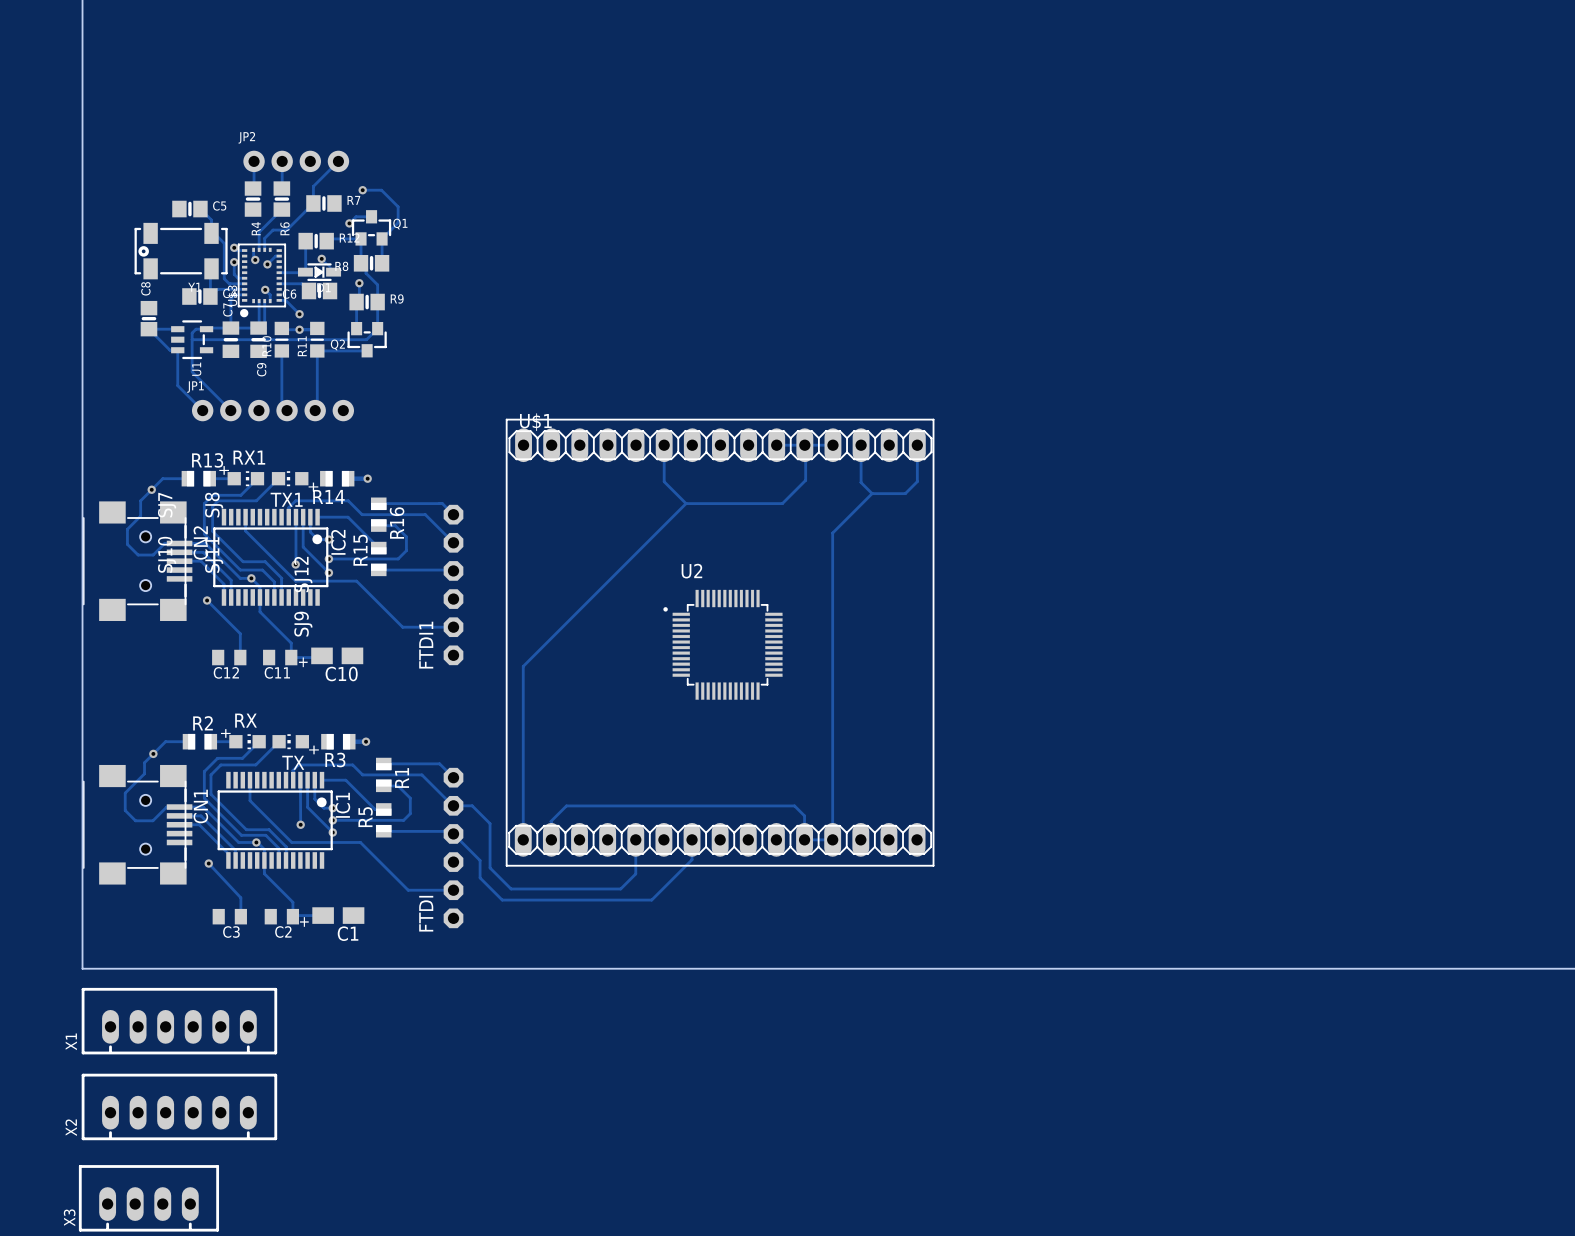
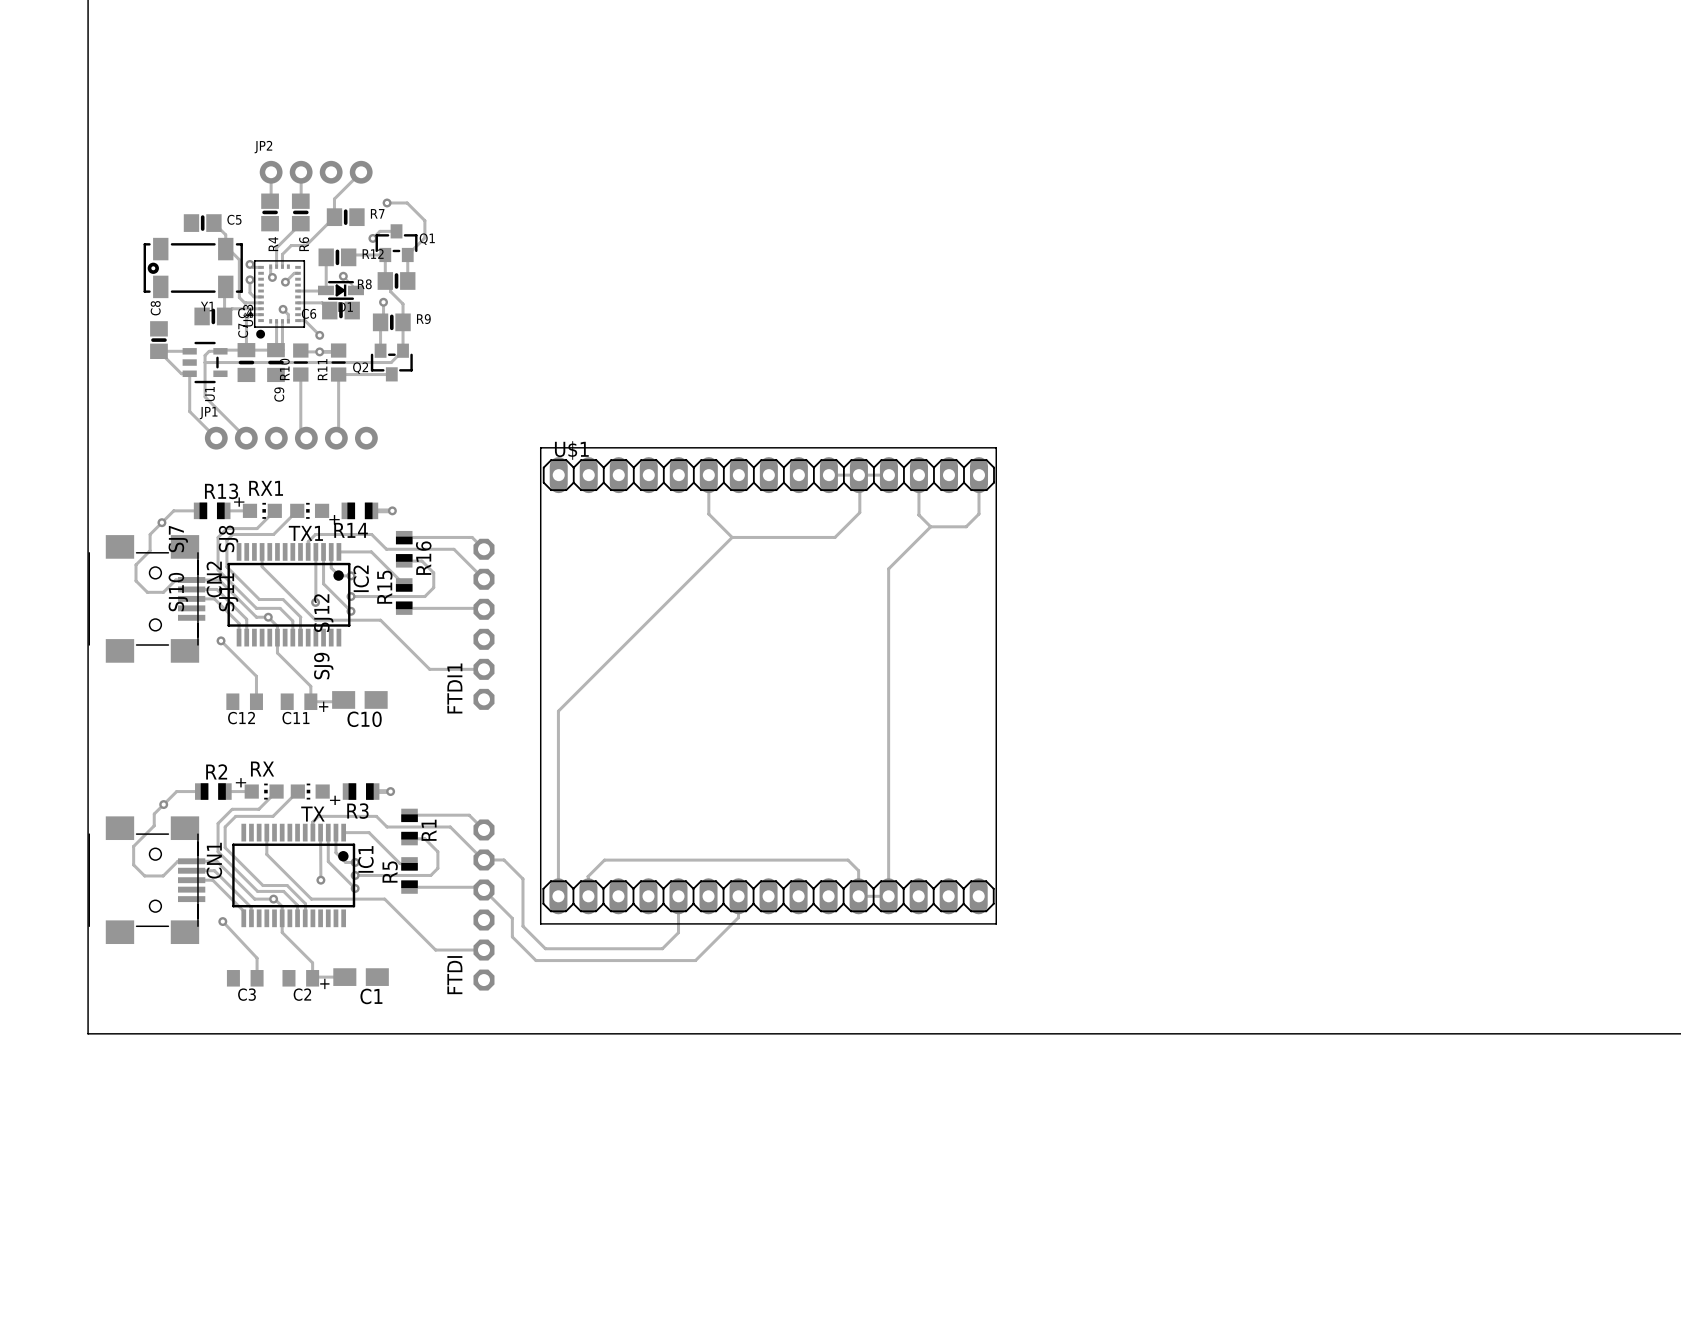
U2: (722, 644) -> none
X1: (179, 1021) -> none
X2: (179, 1106) -> none
X3: (148, 1198) -> none

